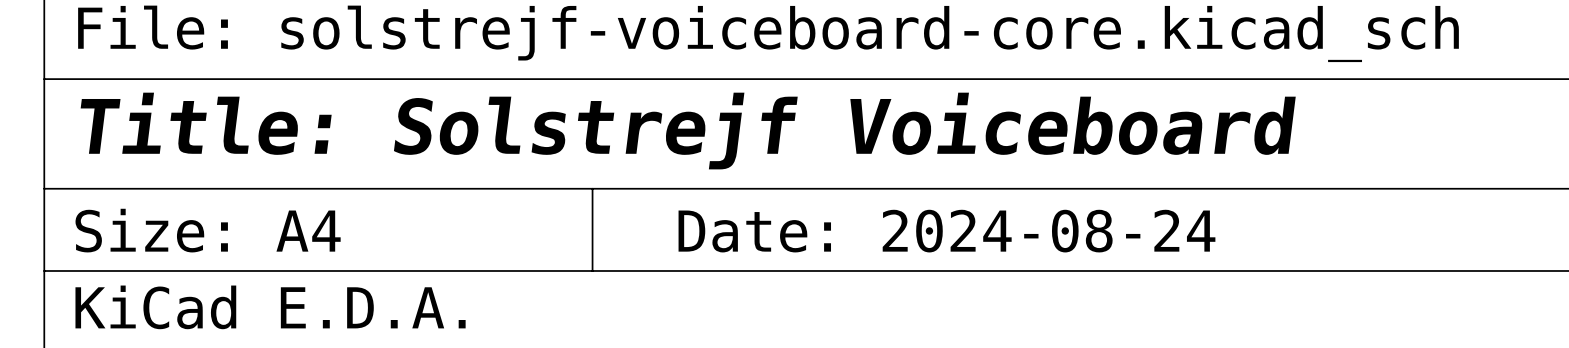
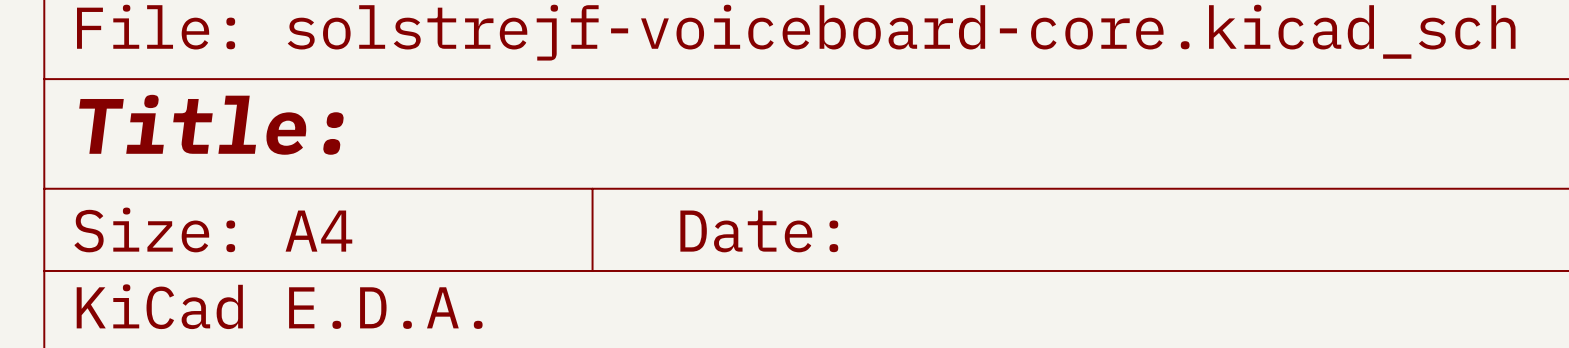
title block: Title: Solstrejf Voiceboard (688, 131) -> Title: (211, 124)
title block: Date: 2024-08-24 (946, 231) -> Date: (759, 231)

